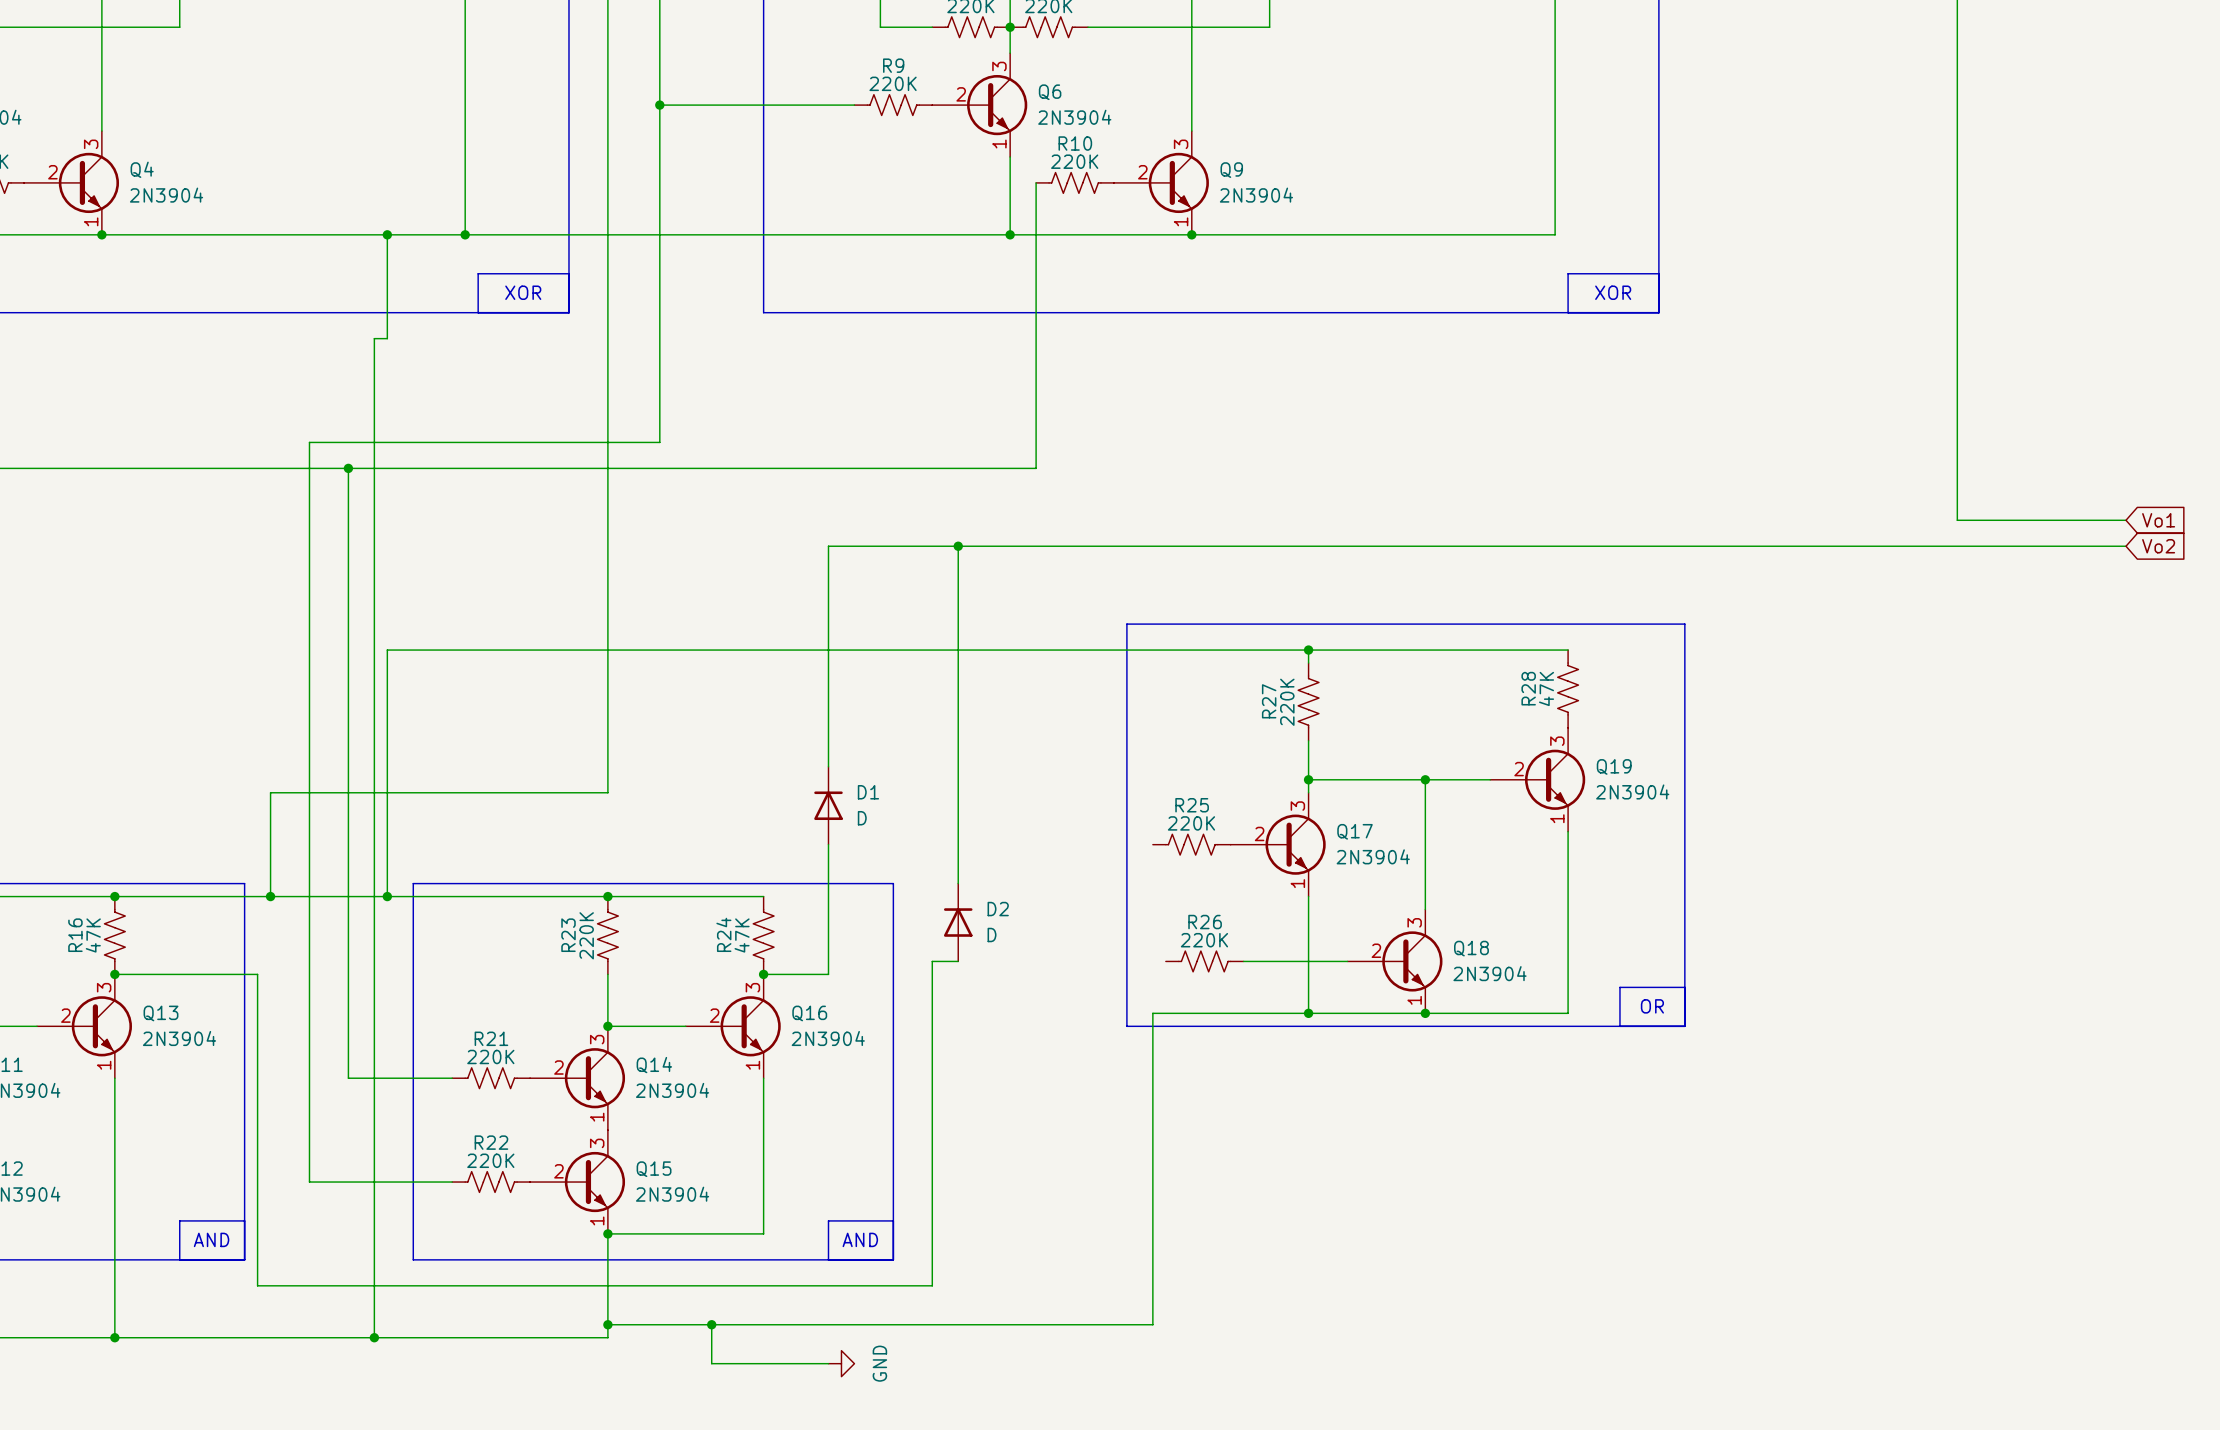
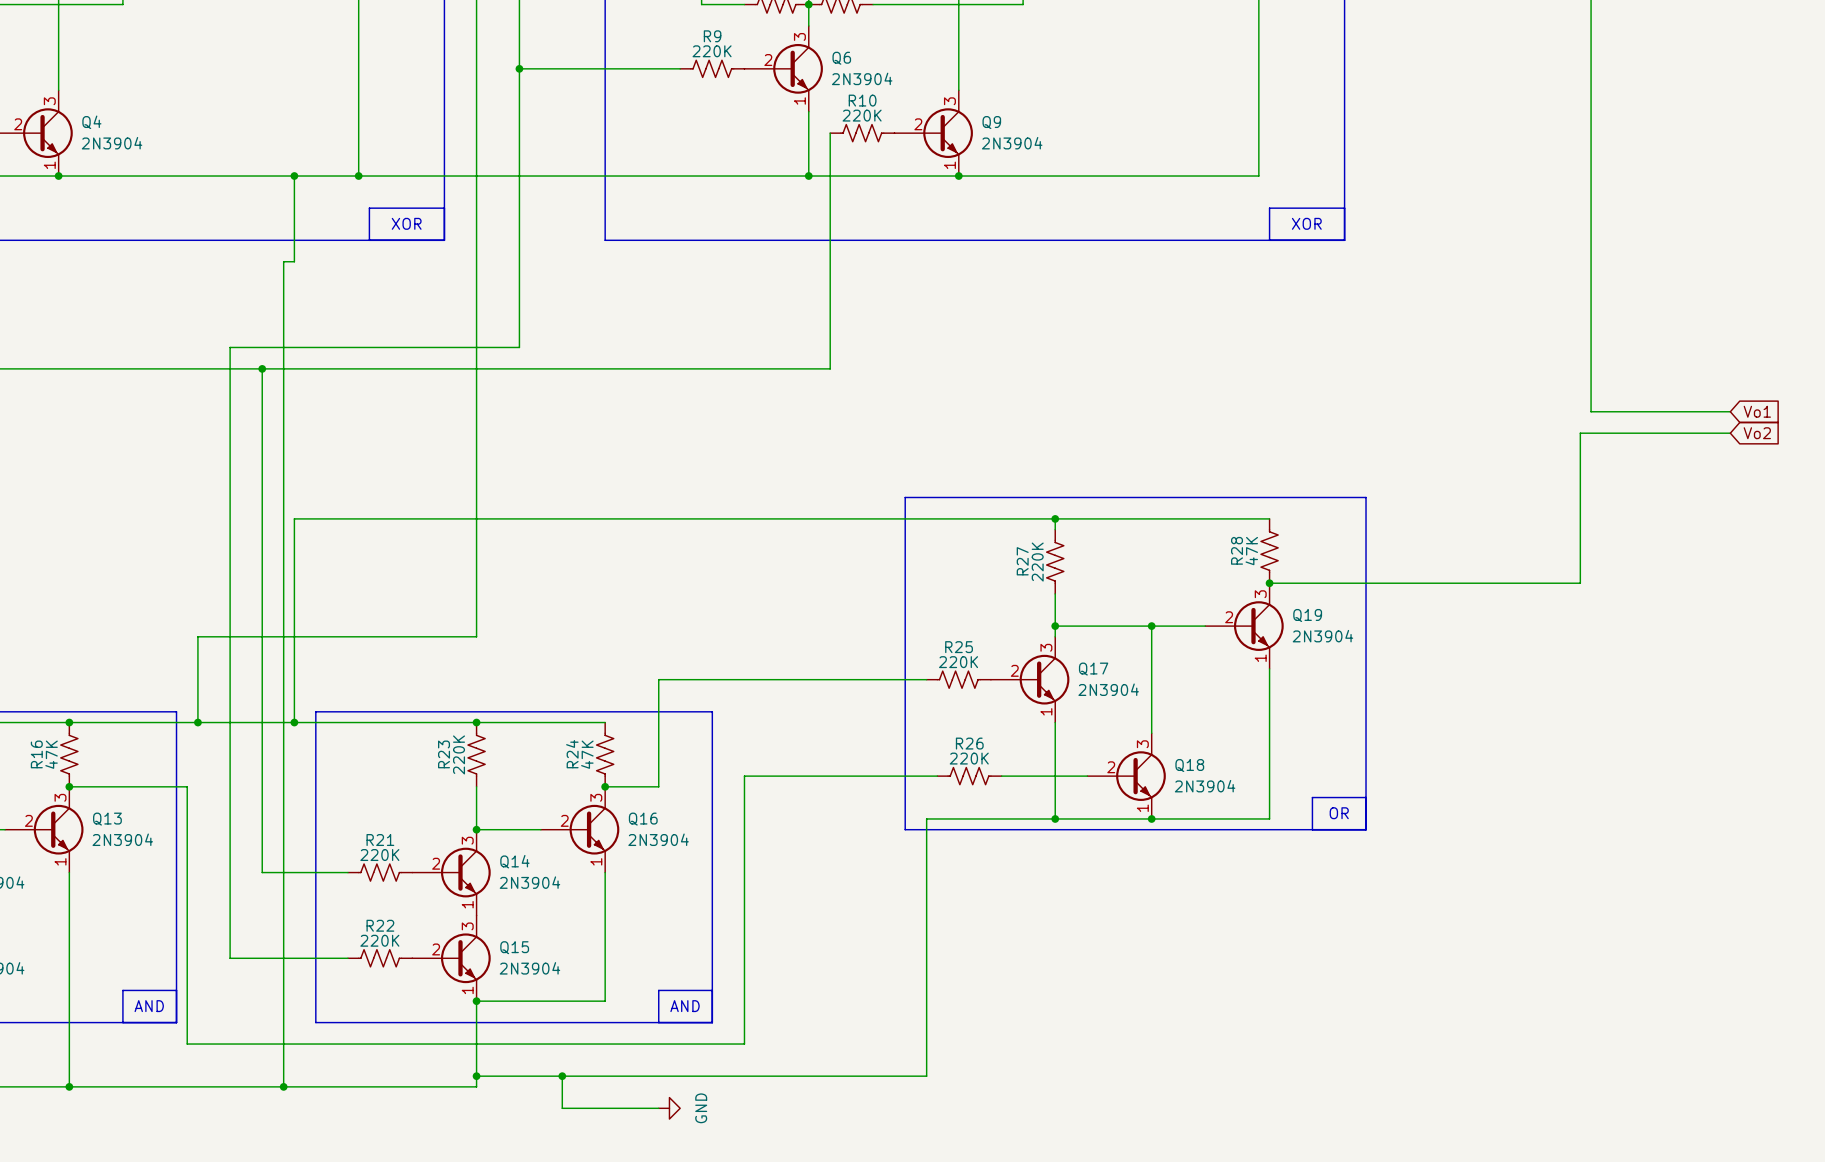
wire: (958, 546) (958, 883) -> none
junction: (958, 546) -> none
wire: (1944, 546) (828, 546) (828, 766) -> (1580, 433) (1580, 583) (1269, 583)
junction: none -> (1269, 583)
D1: D (828, 805) -> none
wire: none -> (658, 679) (926, 679)
D2: D (958, 922) -> none
wire: none -> (765, 776) (937, 776)

